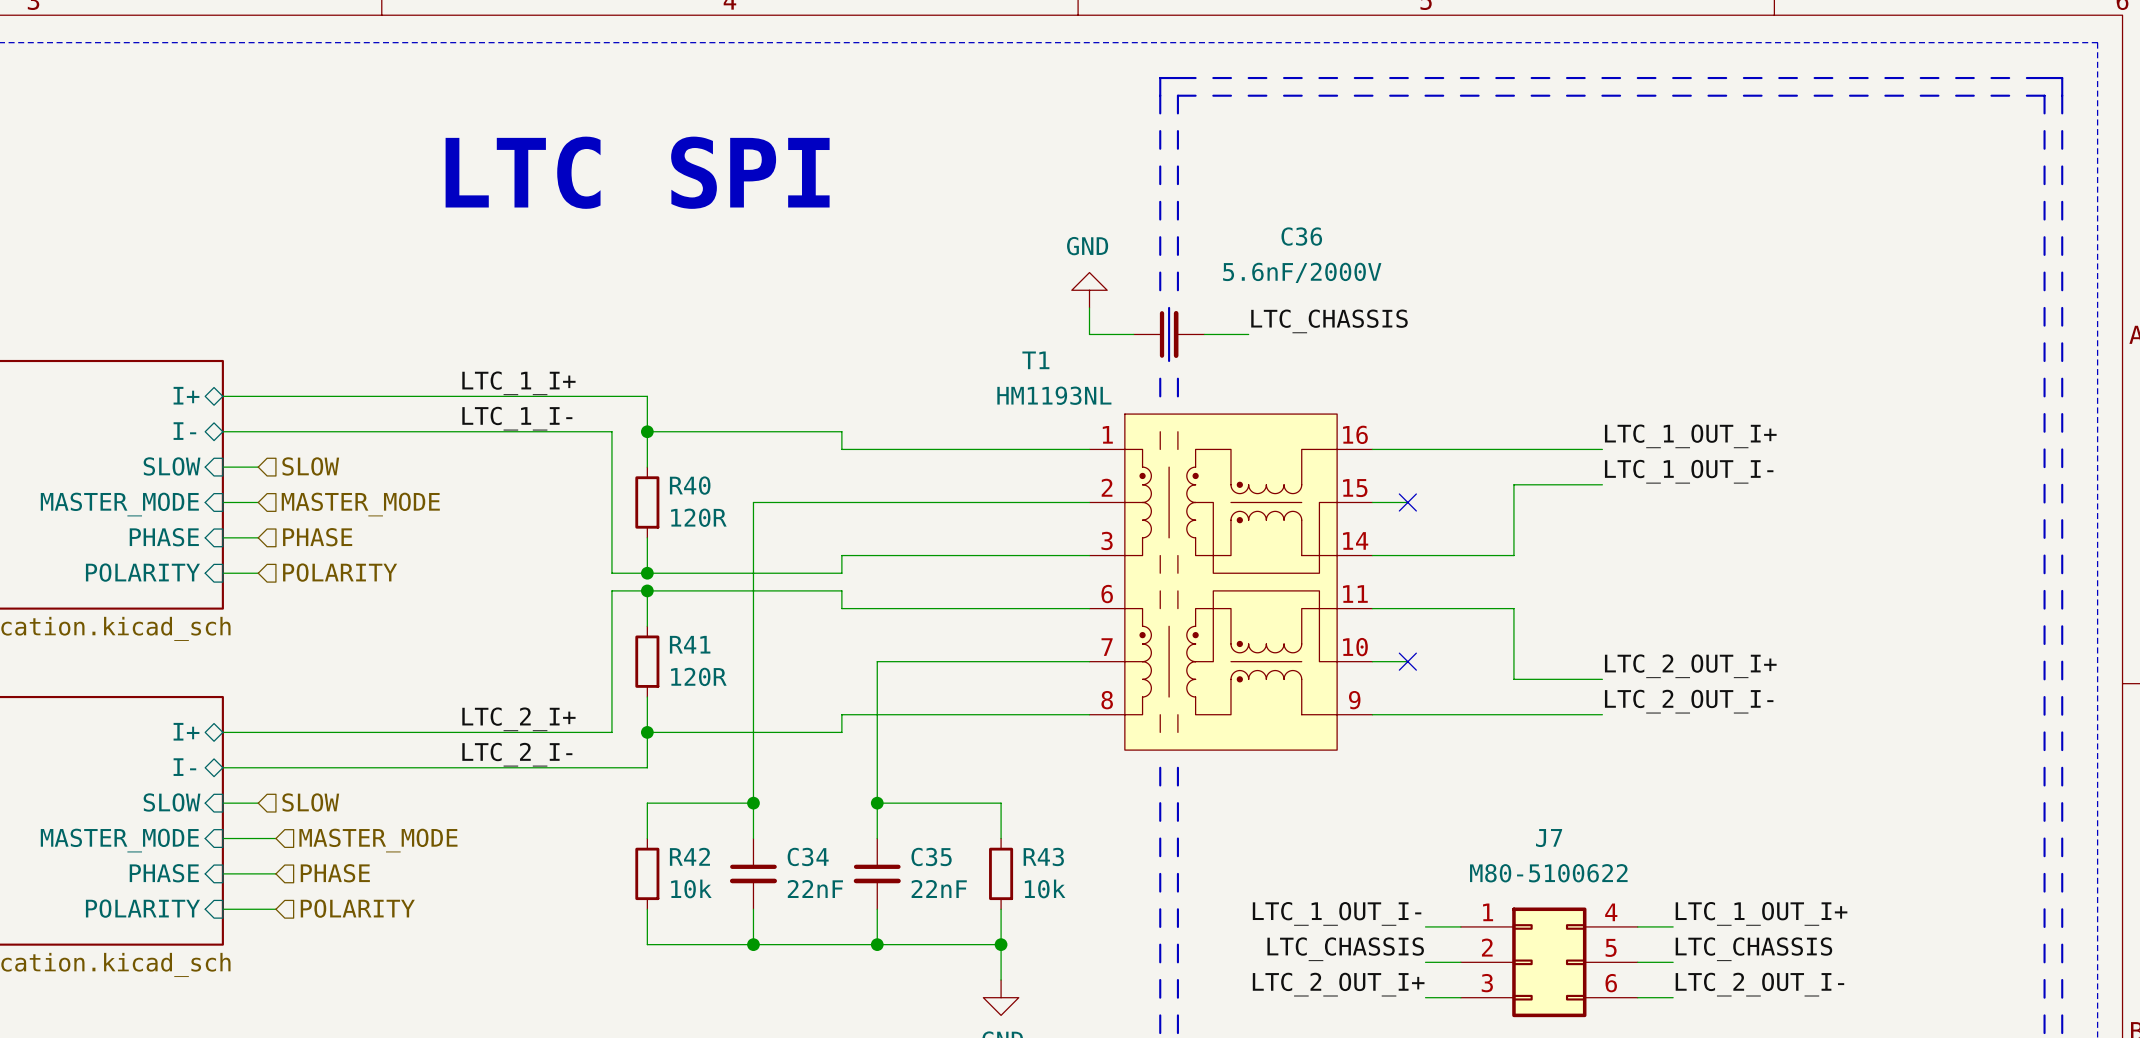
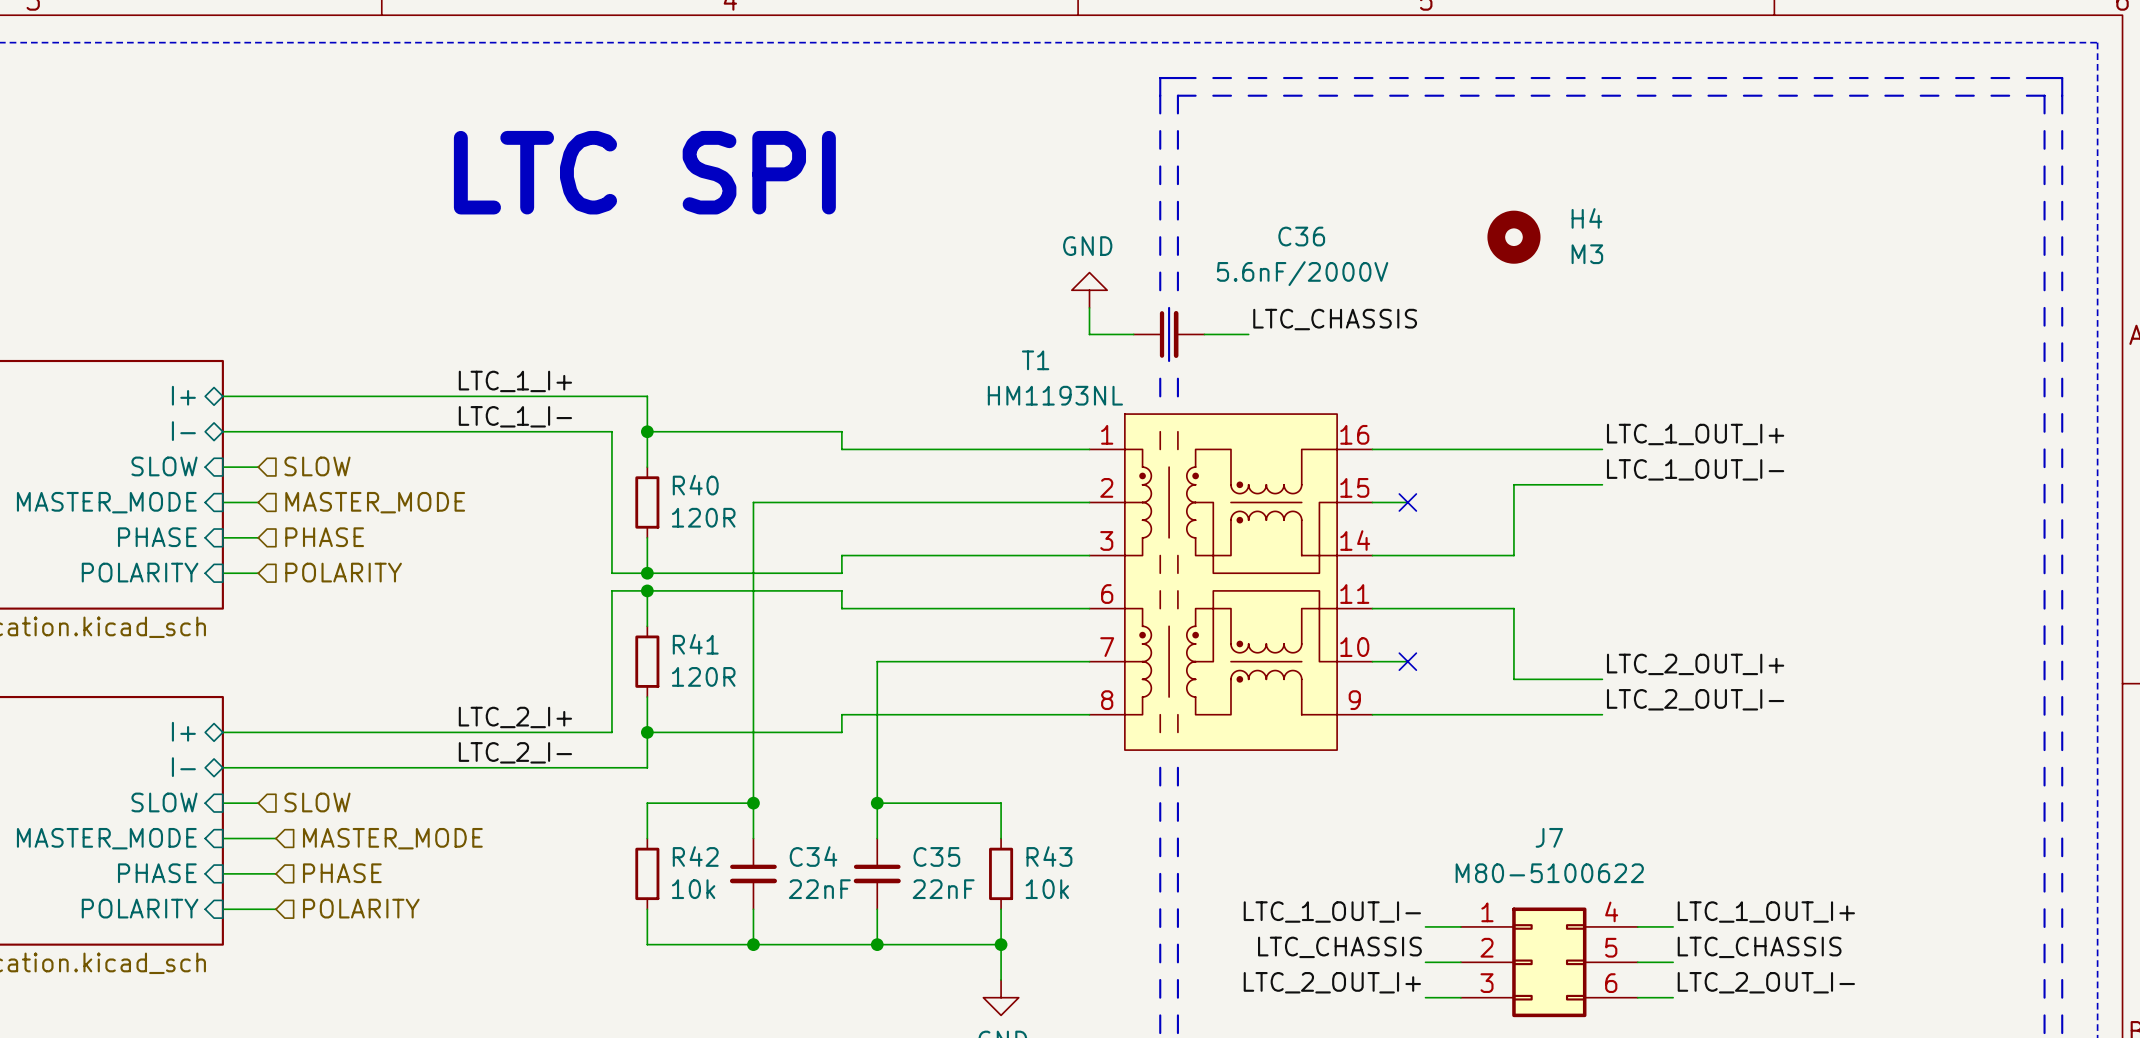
H4: none -> M3 (1513, 237)

